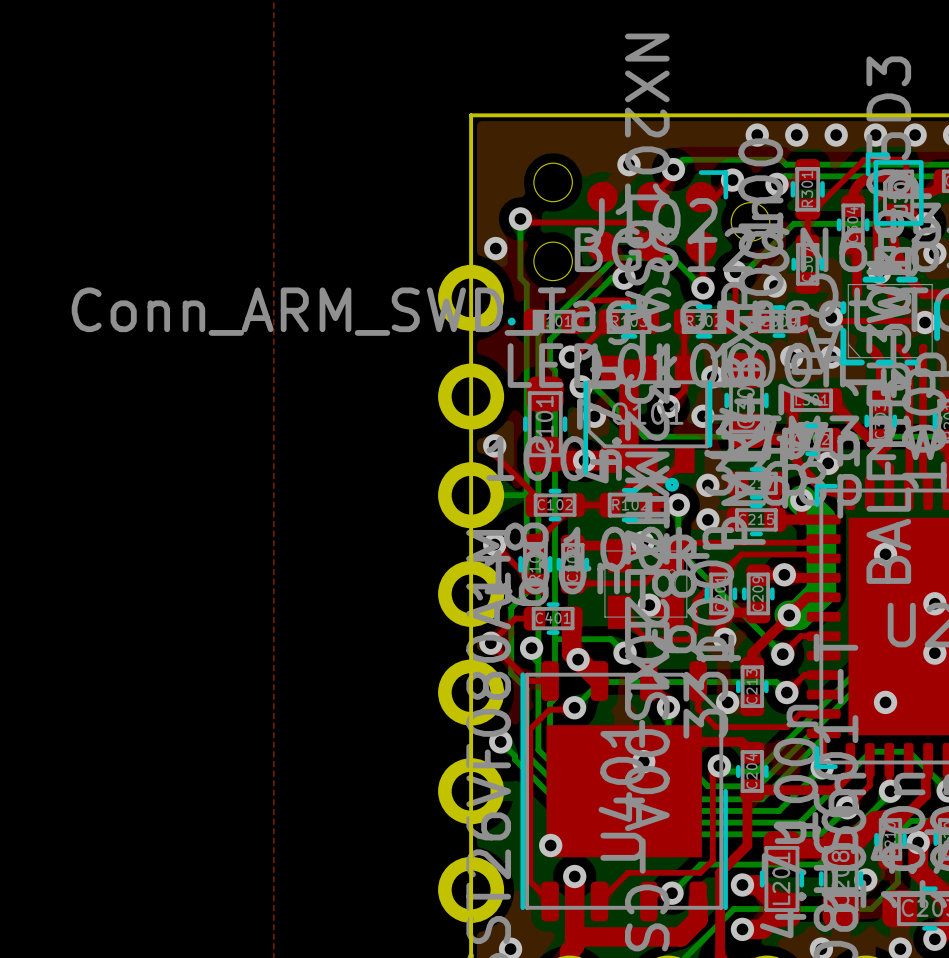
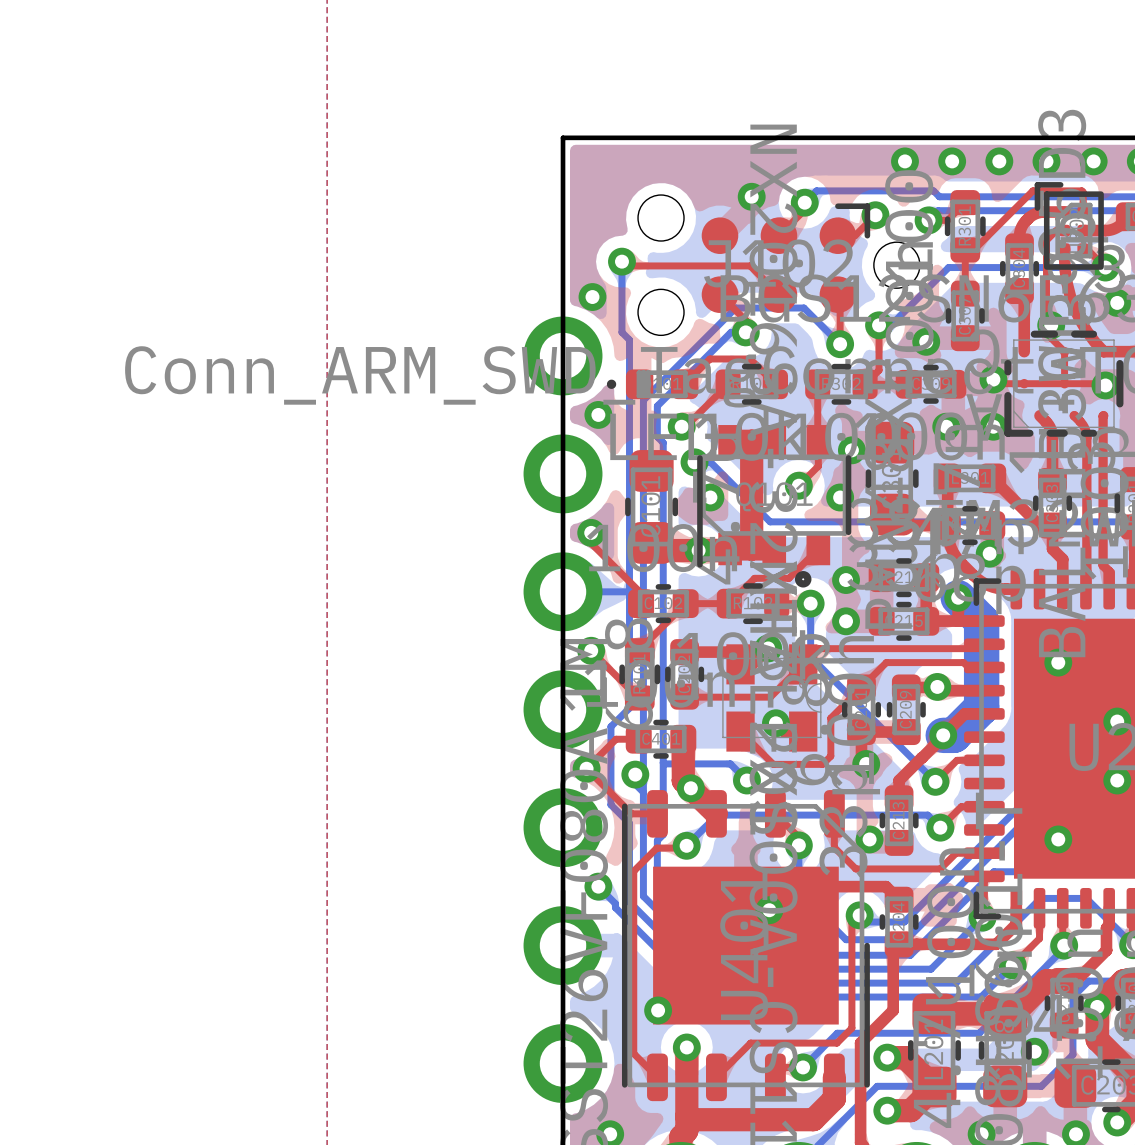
via: none -> (598, 414)

